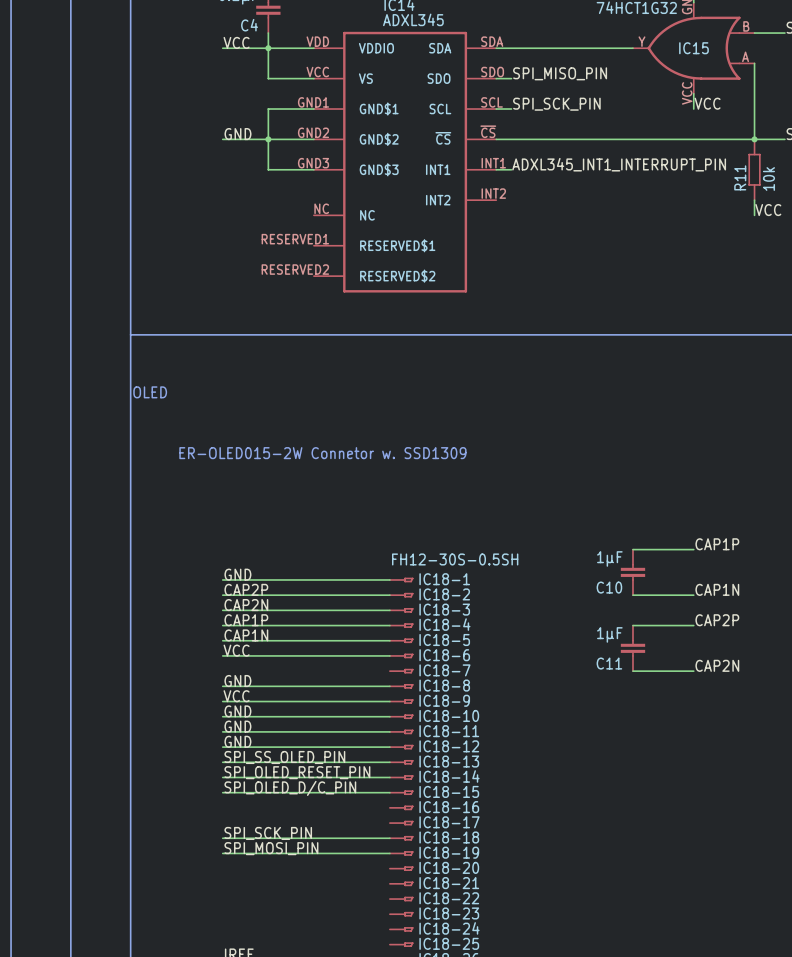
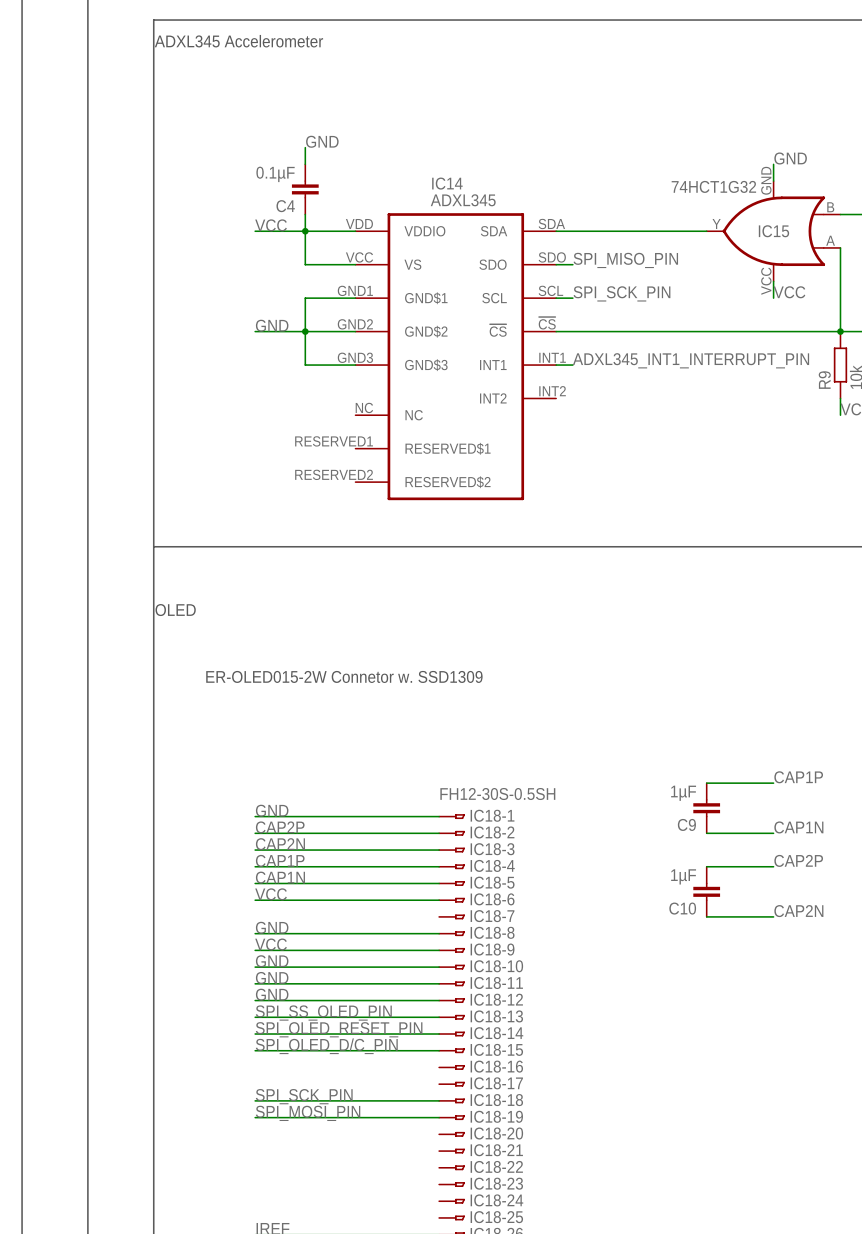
R11 name: R11 (740, 177) -> R9 (824, 380)
C10 name: C10 (609, 587) -> C9 (686, 824)
C11 name: C11 (609, 663) -> C10 (682, 908)

